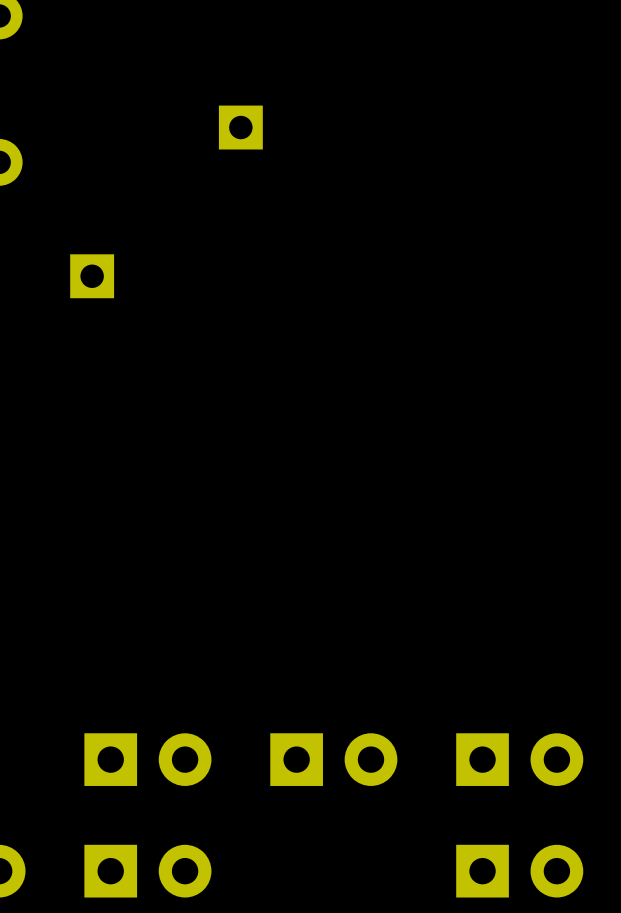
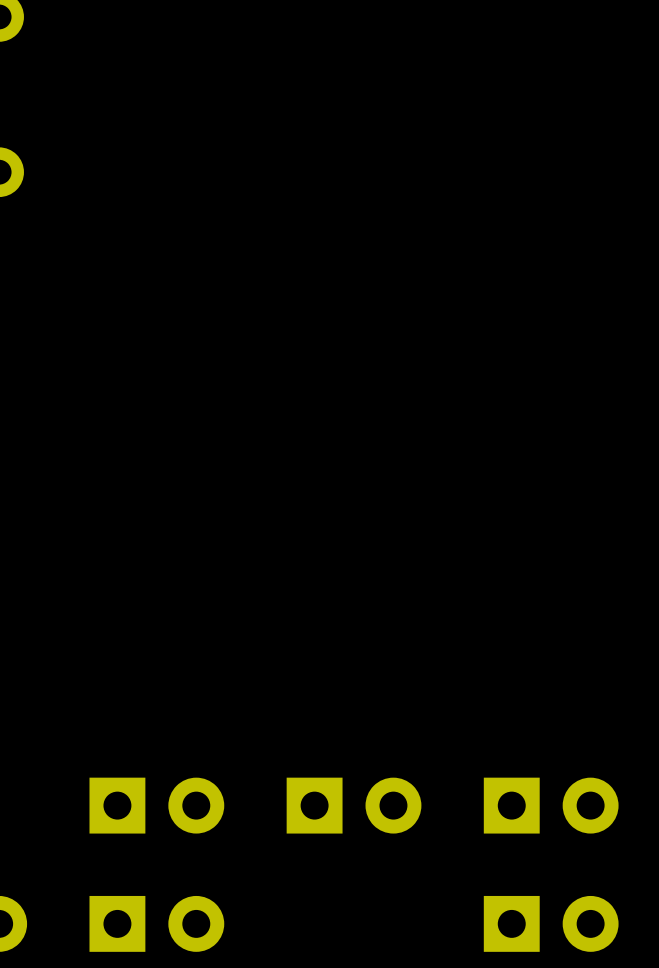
part: (240, 127) -> none
part: (92, 276) -> none

